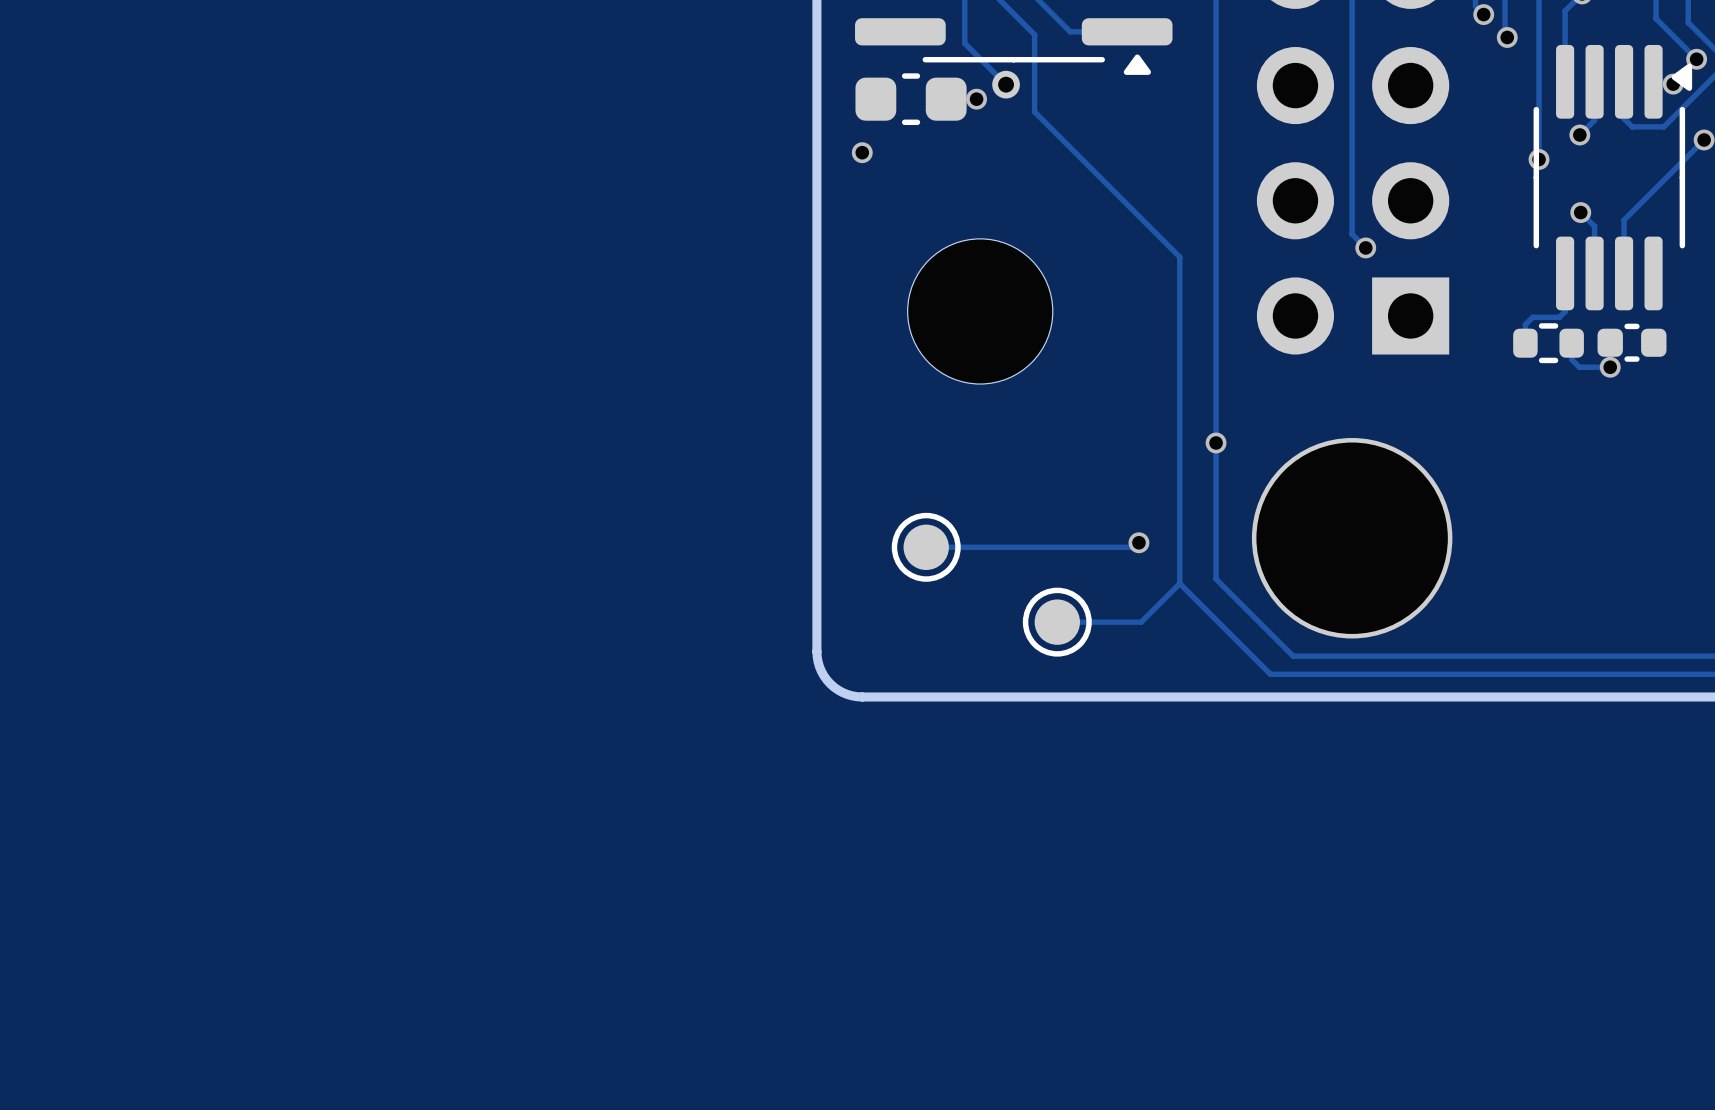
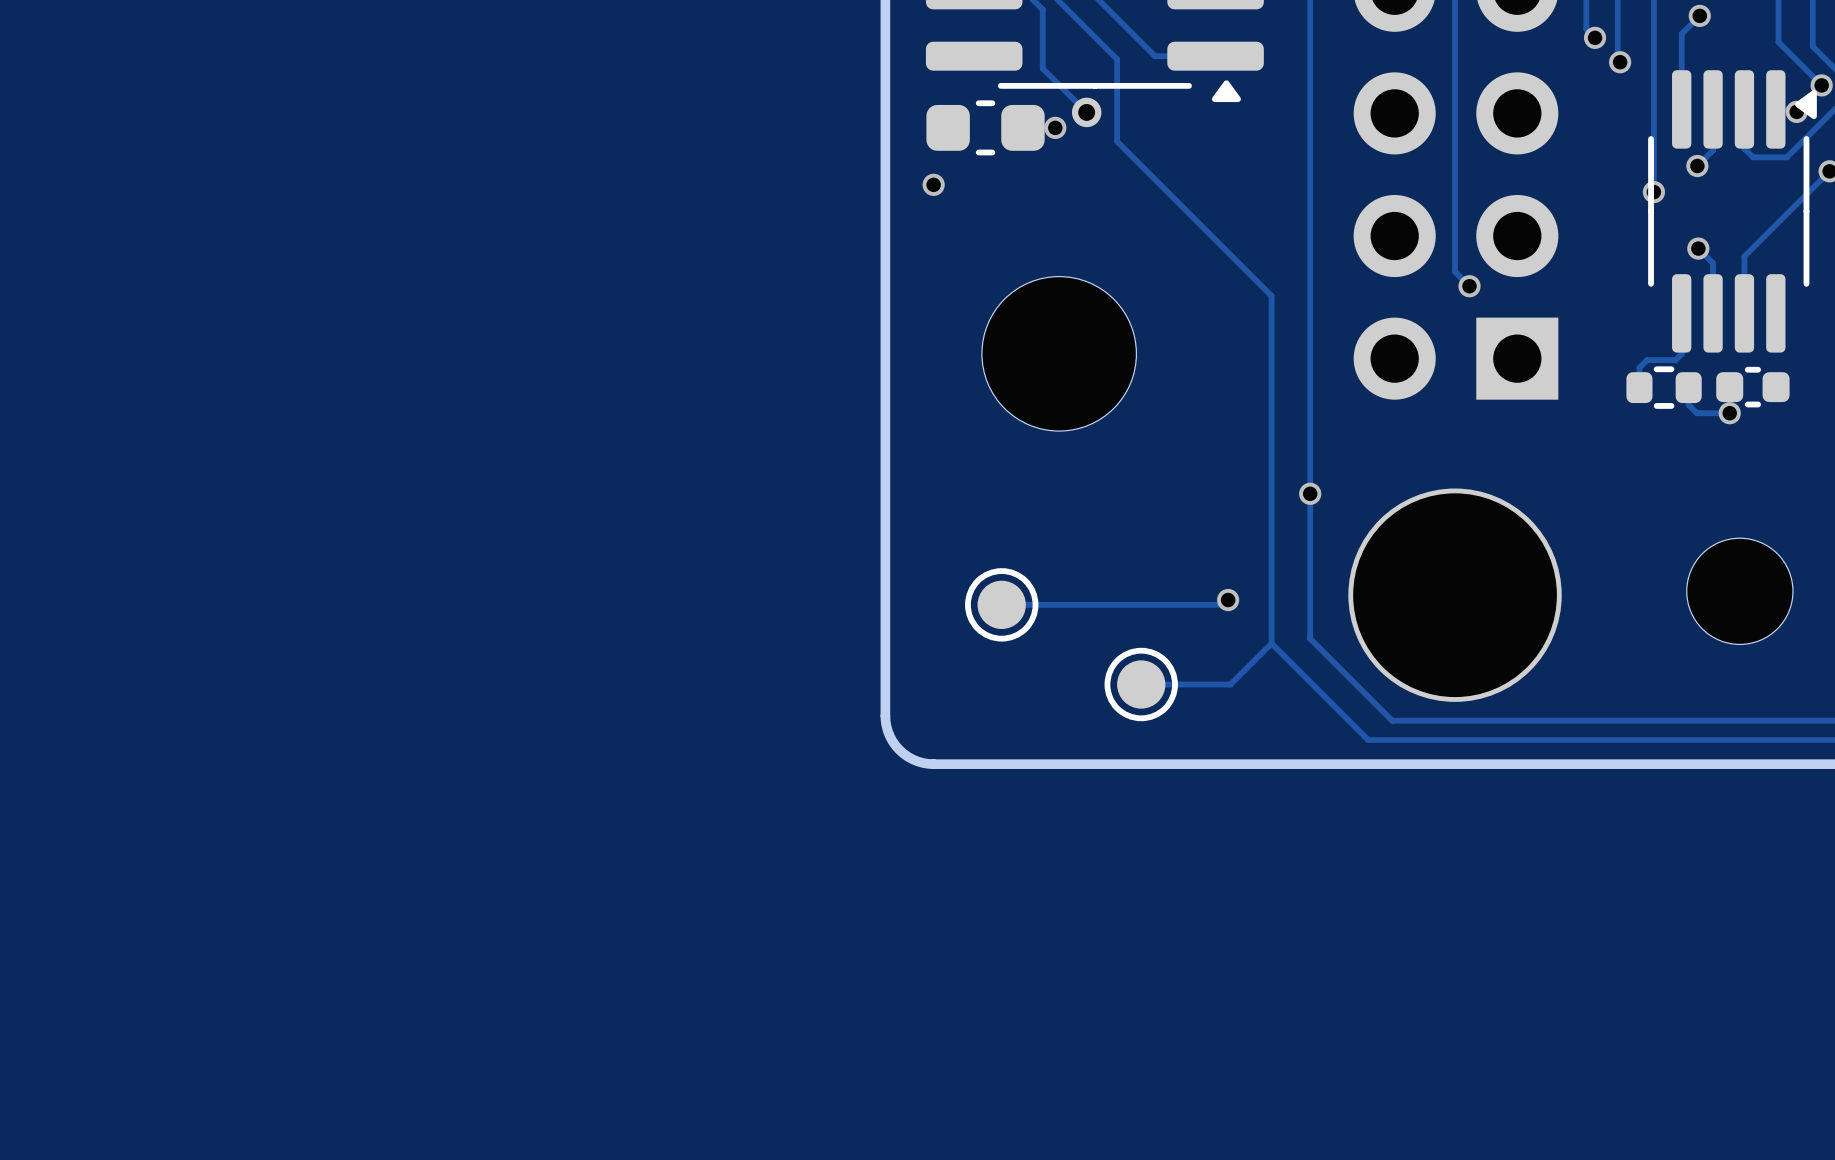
part: none -> (1739, 591)

